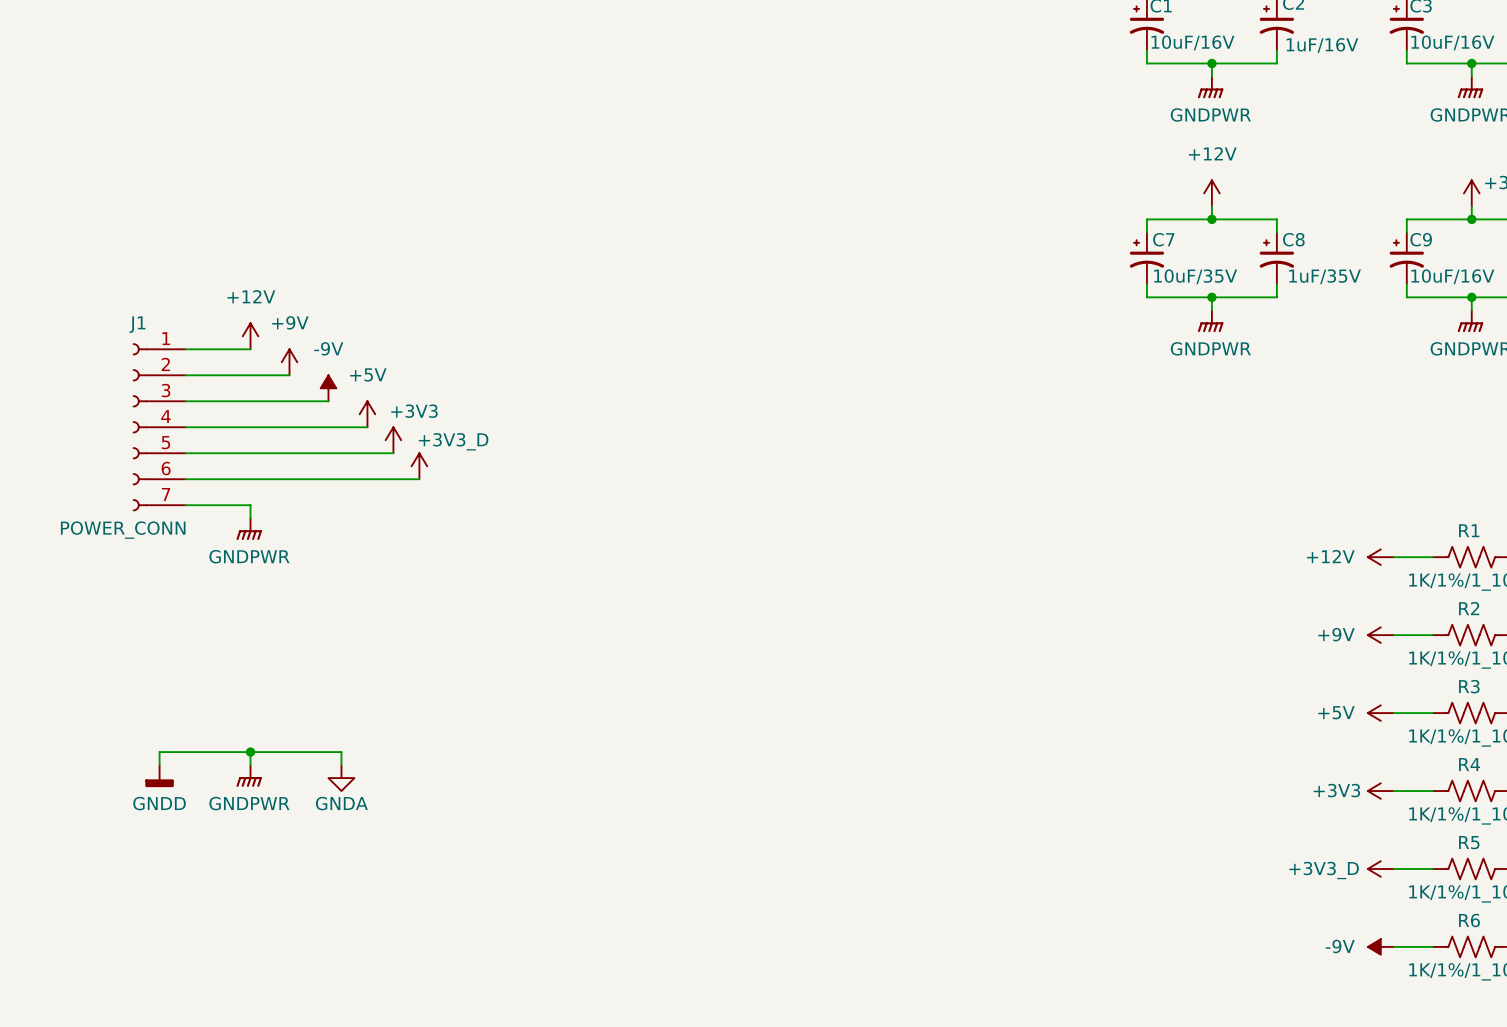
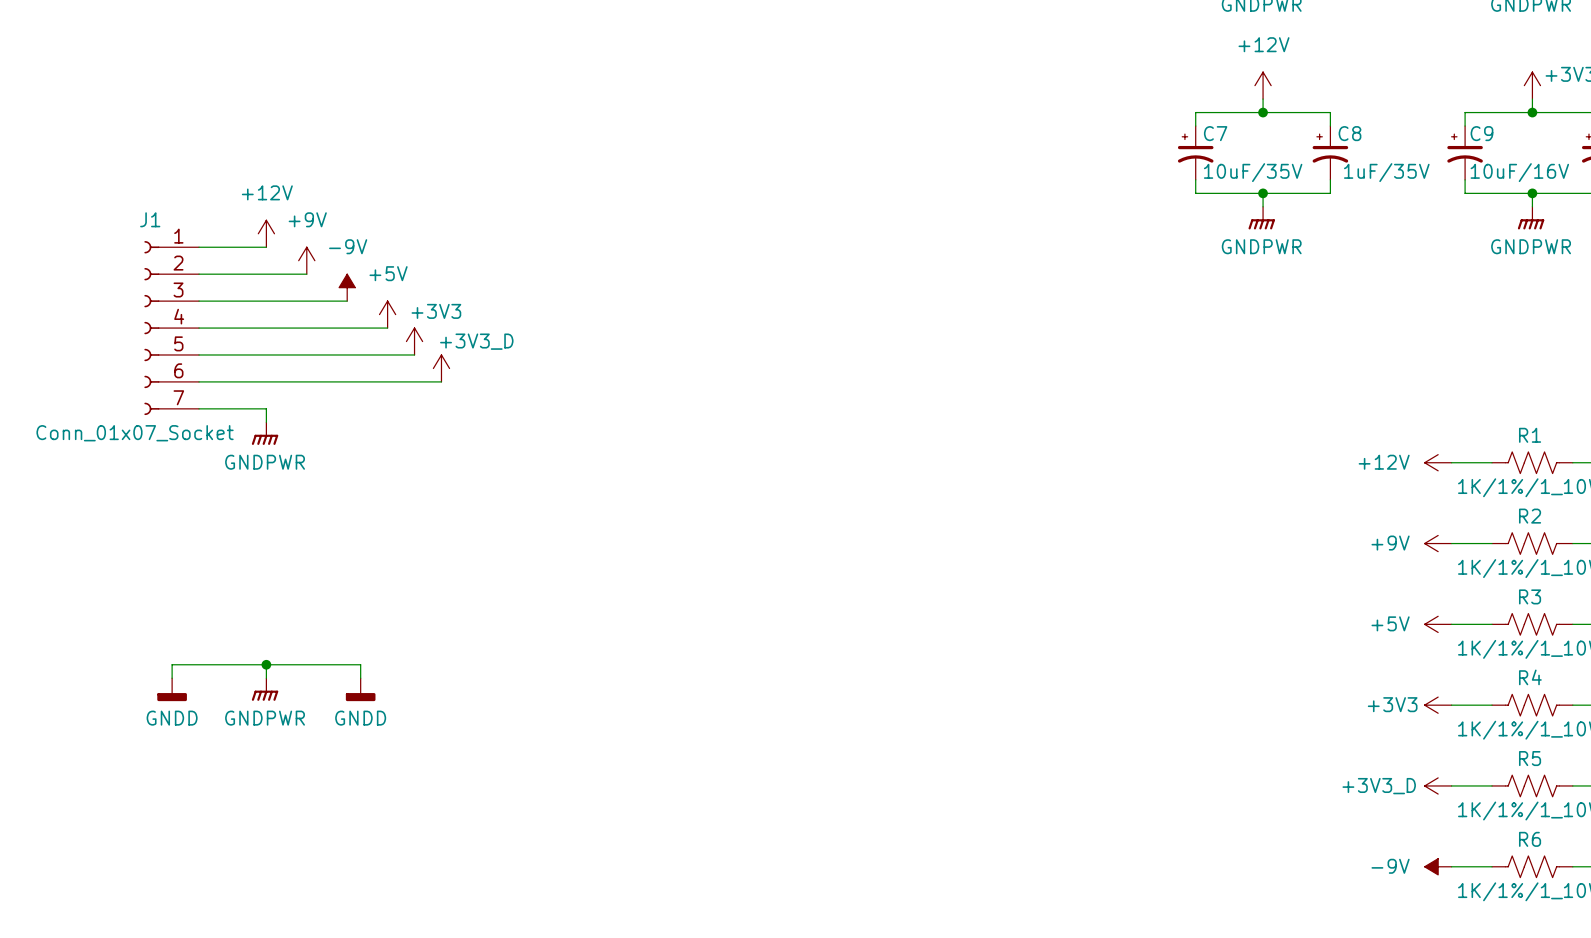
J1 value: POWER_CONN (123, 530) -> Conn_01x07_Socket (135, 433)
power symbol: GNDA (341, 778) -> GNDD (360, 689)

